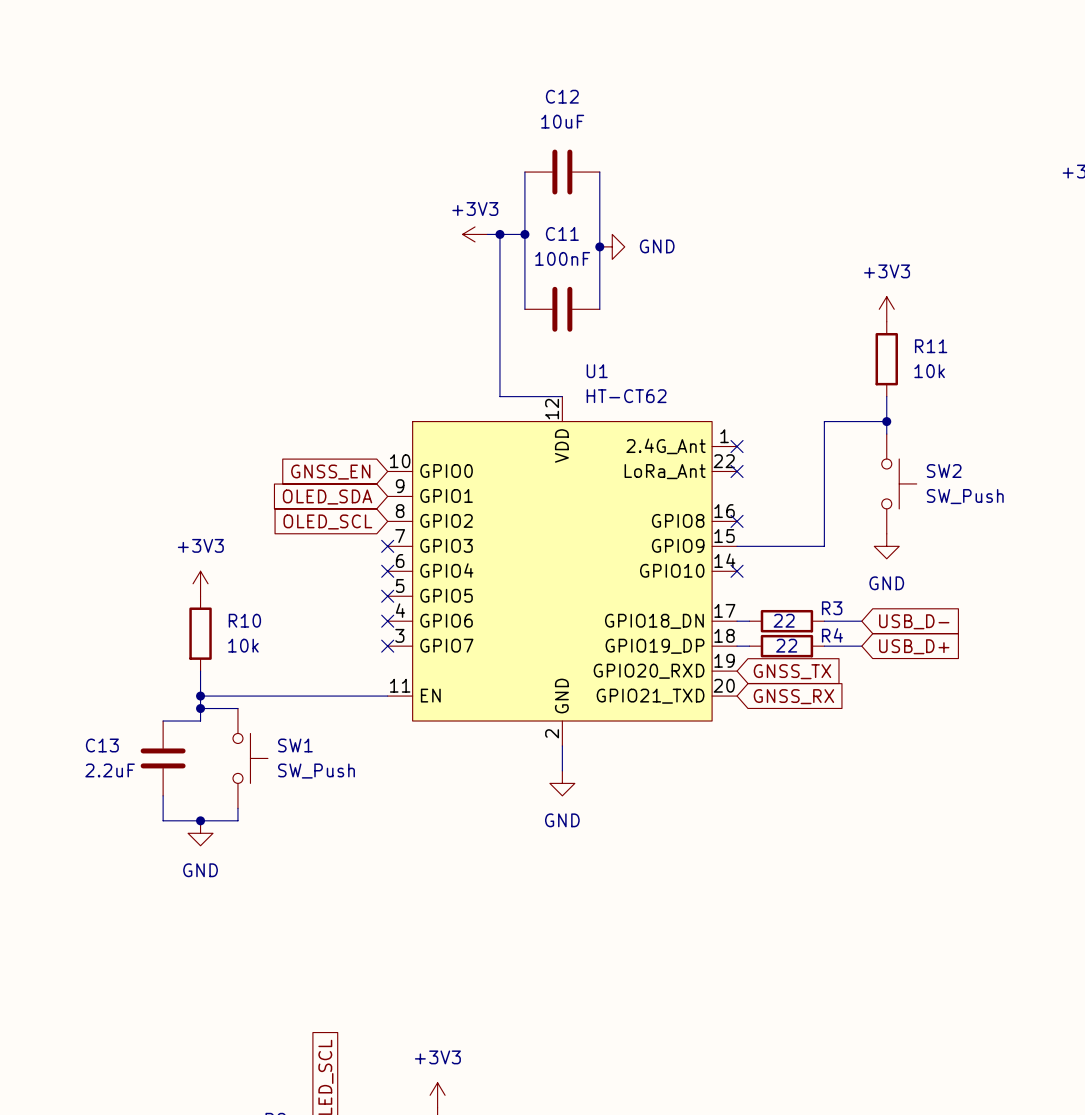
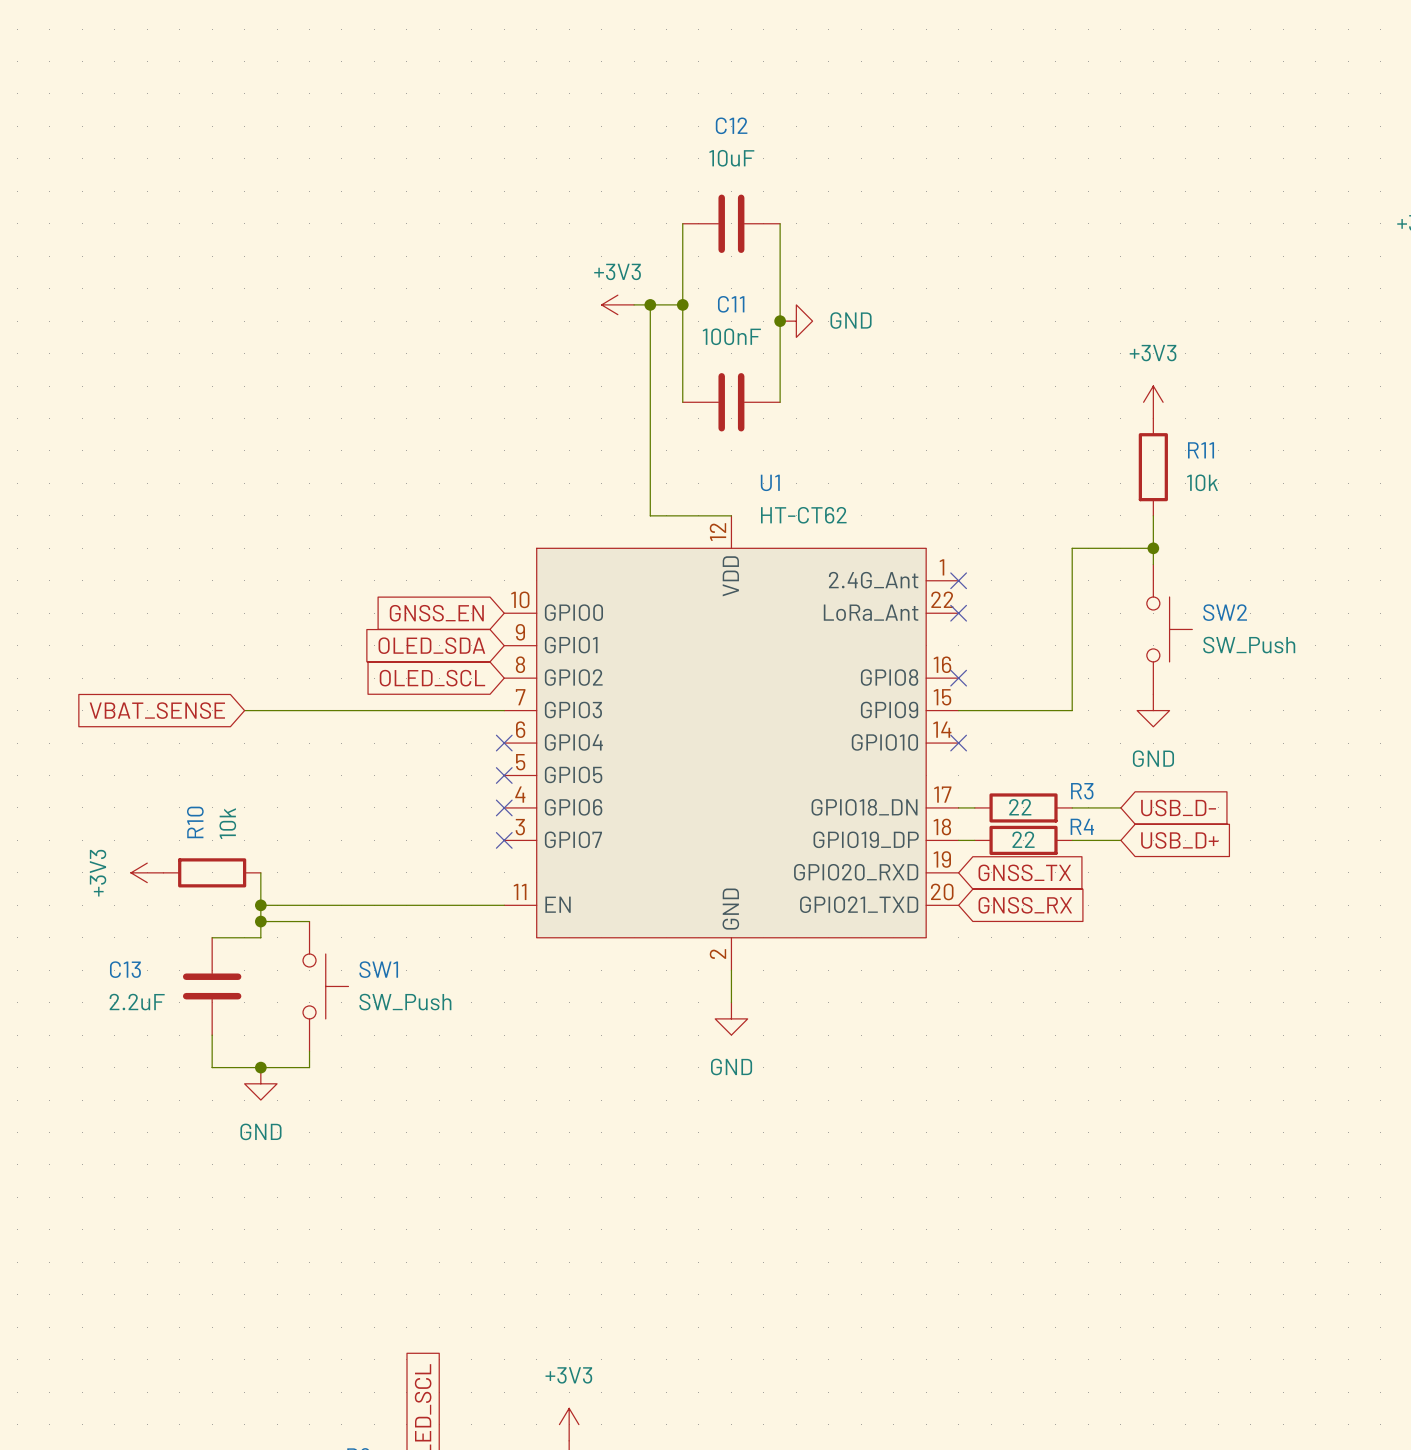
global label: none -> VBAT_SENSE (157, 710)
wire: none -> (244, 710) (504, 710)
no-connect mark: (387, 546) -> none
power symbol rotation: 0° (200, 583) -> 90° counterclockwise (147, 872)
power symbol position: +3V3 (200, 583) -> +3V3 (147, 872)
R10 name position: R10 (244, 620) -> R10 (195, 822)
R10 rotation: 0° (200, 633) -> 90° clockwise (212, 872)
R10 position: (200, 633) -> (212, 872)
R10 value position: 10k (243, 645) -> 10k (227, 823)

